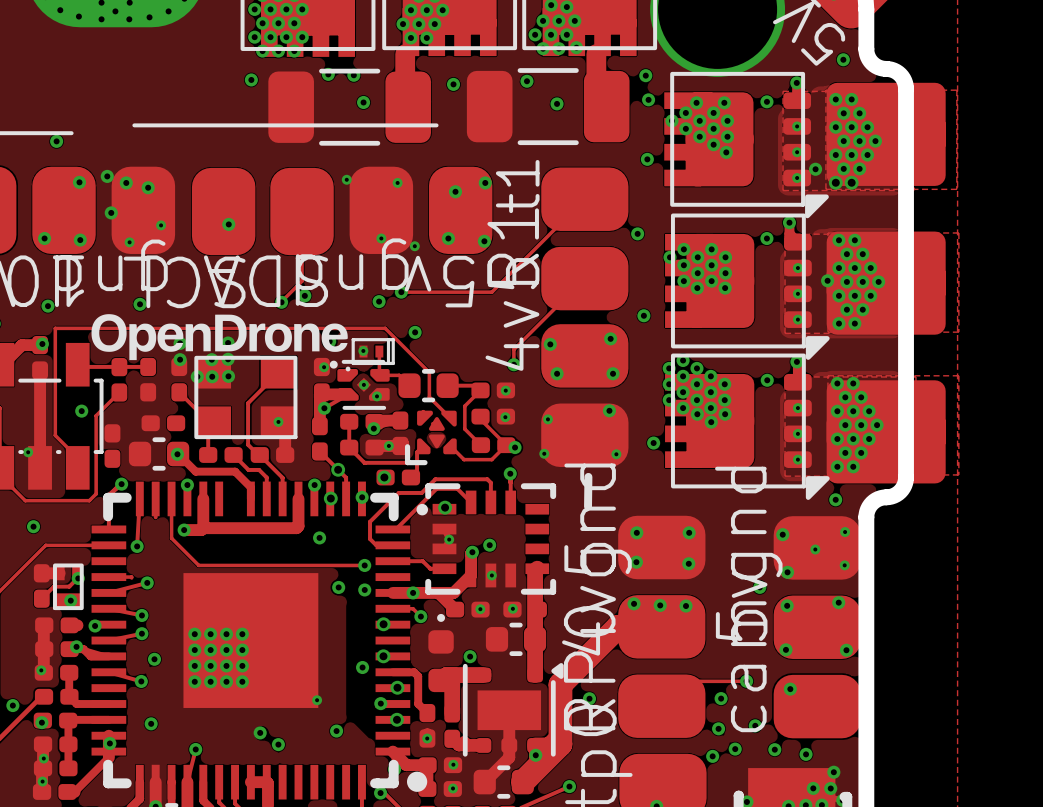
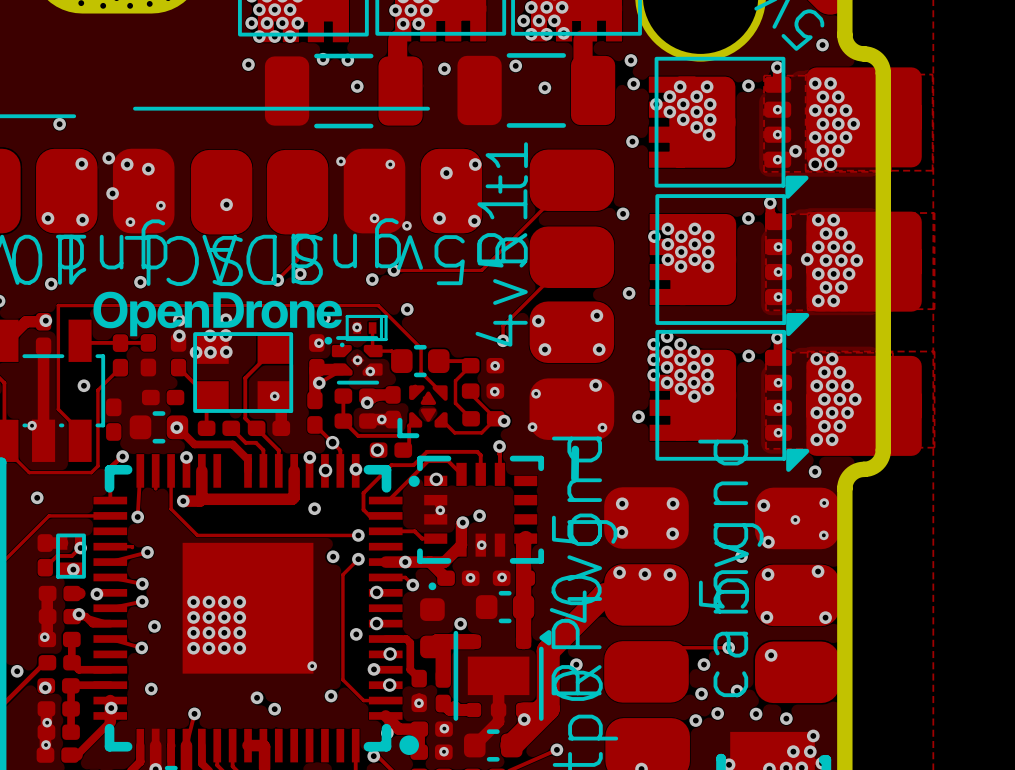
track: none -> (358, 559) (342, 574) (342, 679) (363, 700) (385, 700)

